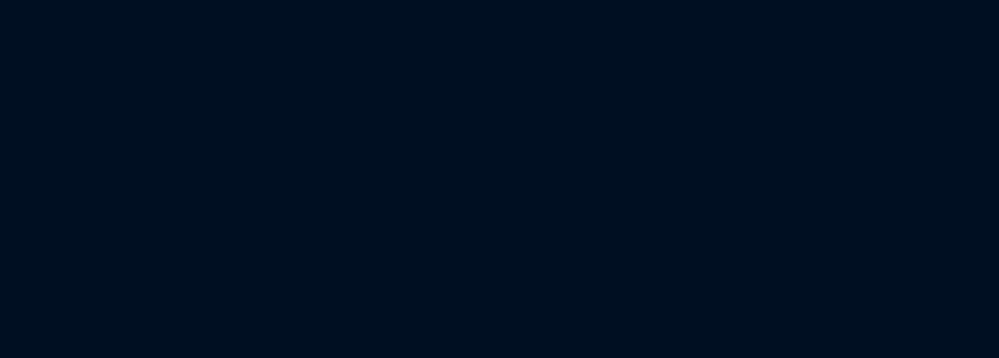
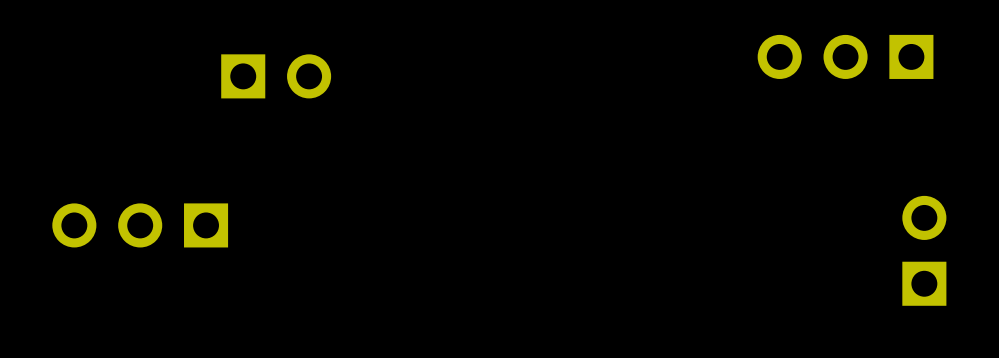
part: none -> (845, 56)
part: none -> (276, 76)
part: none -> (140, 225)
part: none -> (924, 250)

